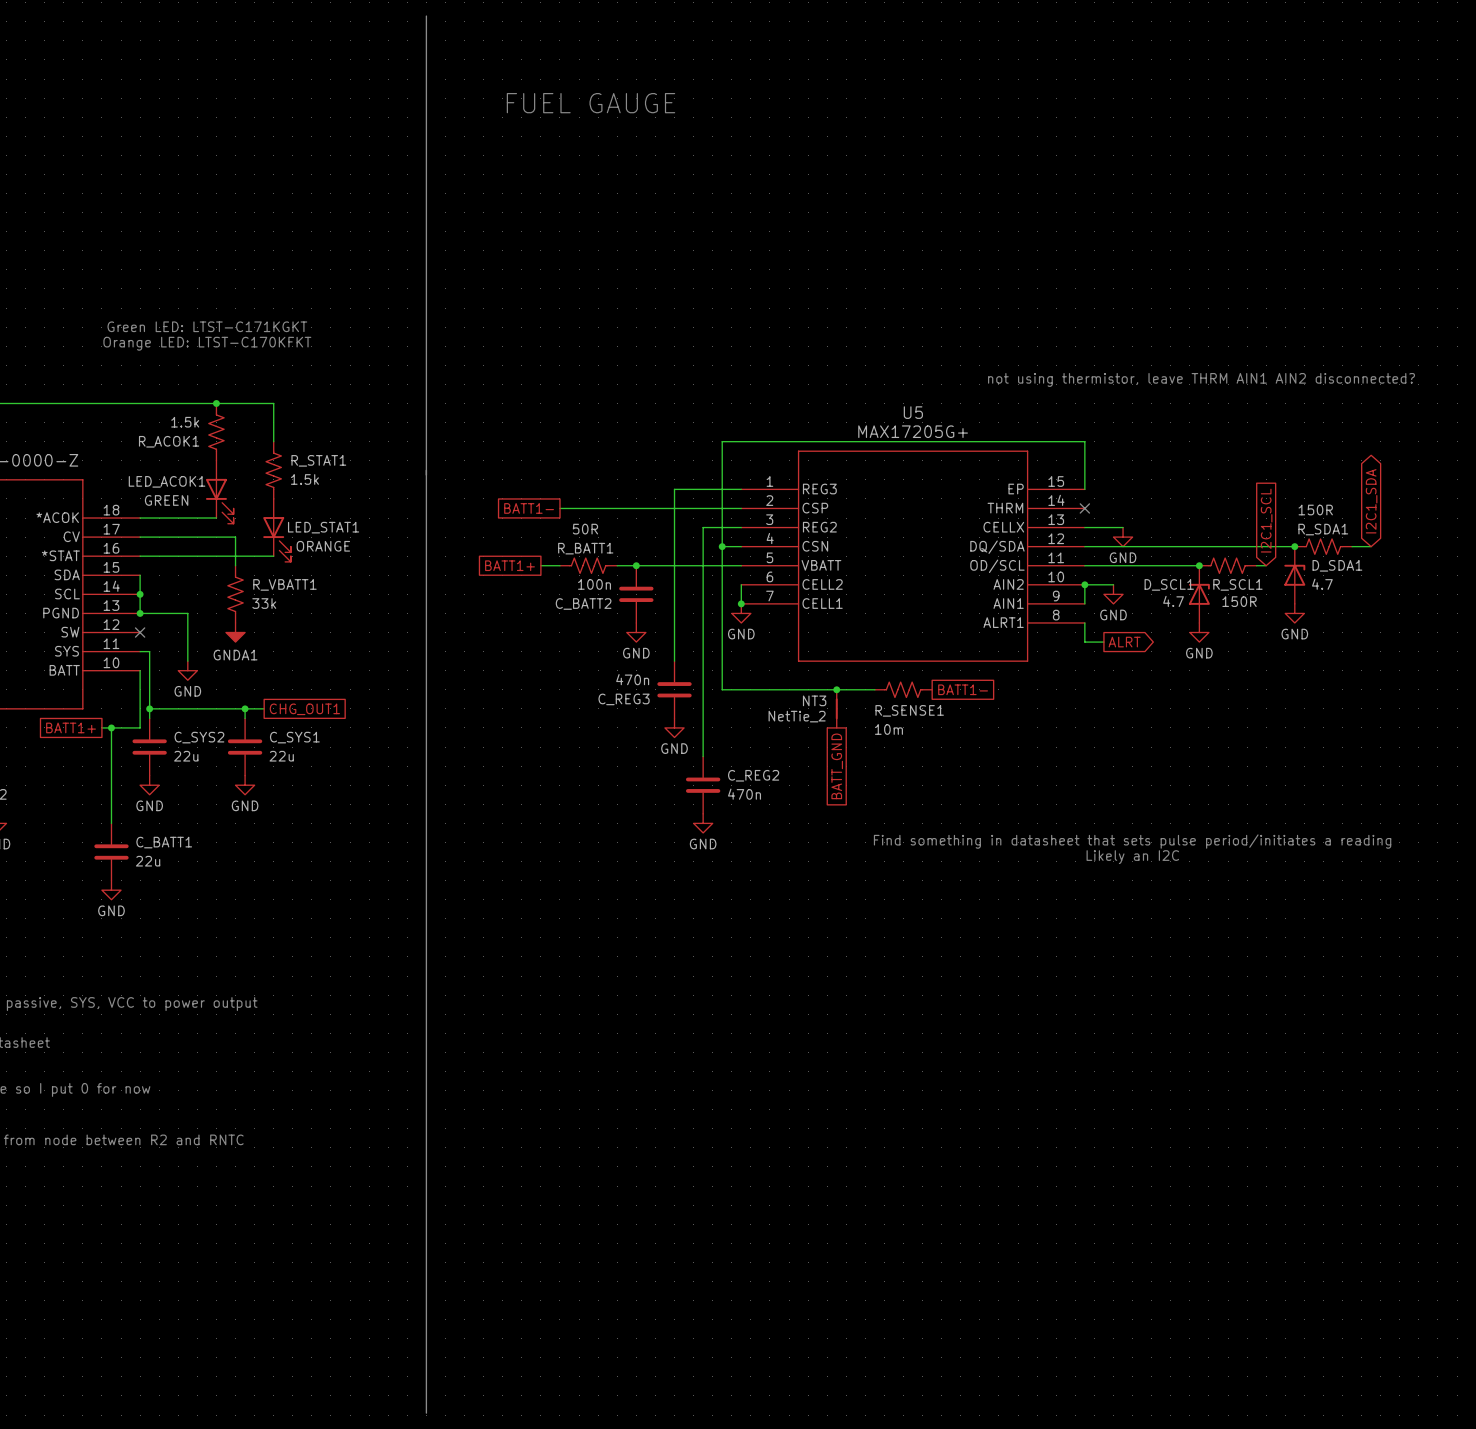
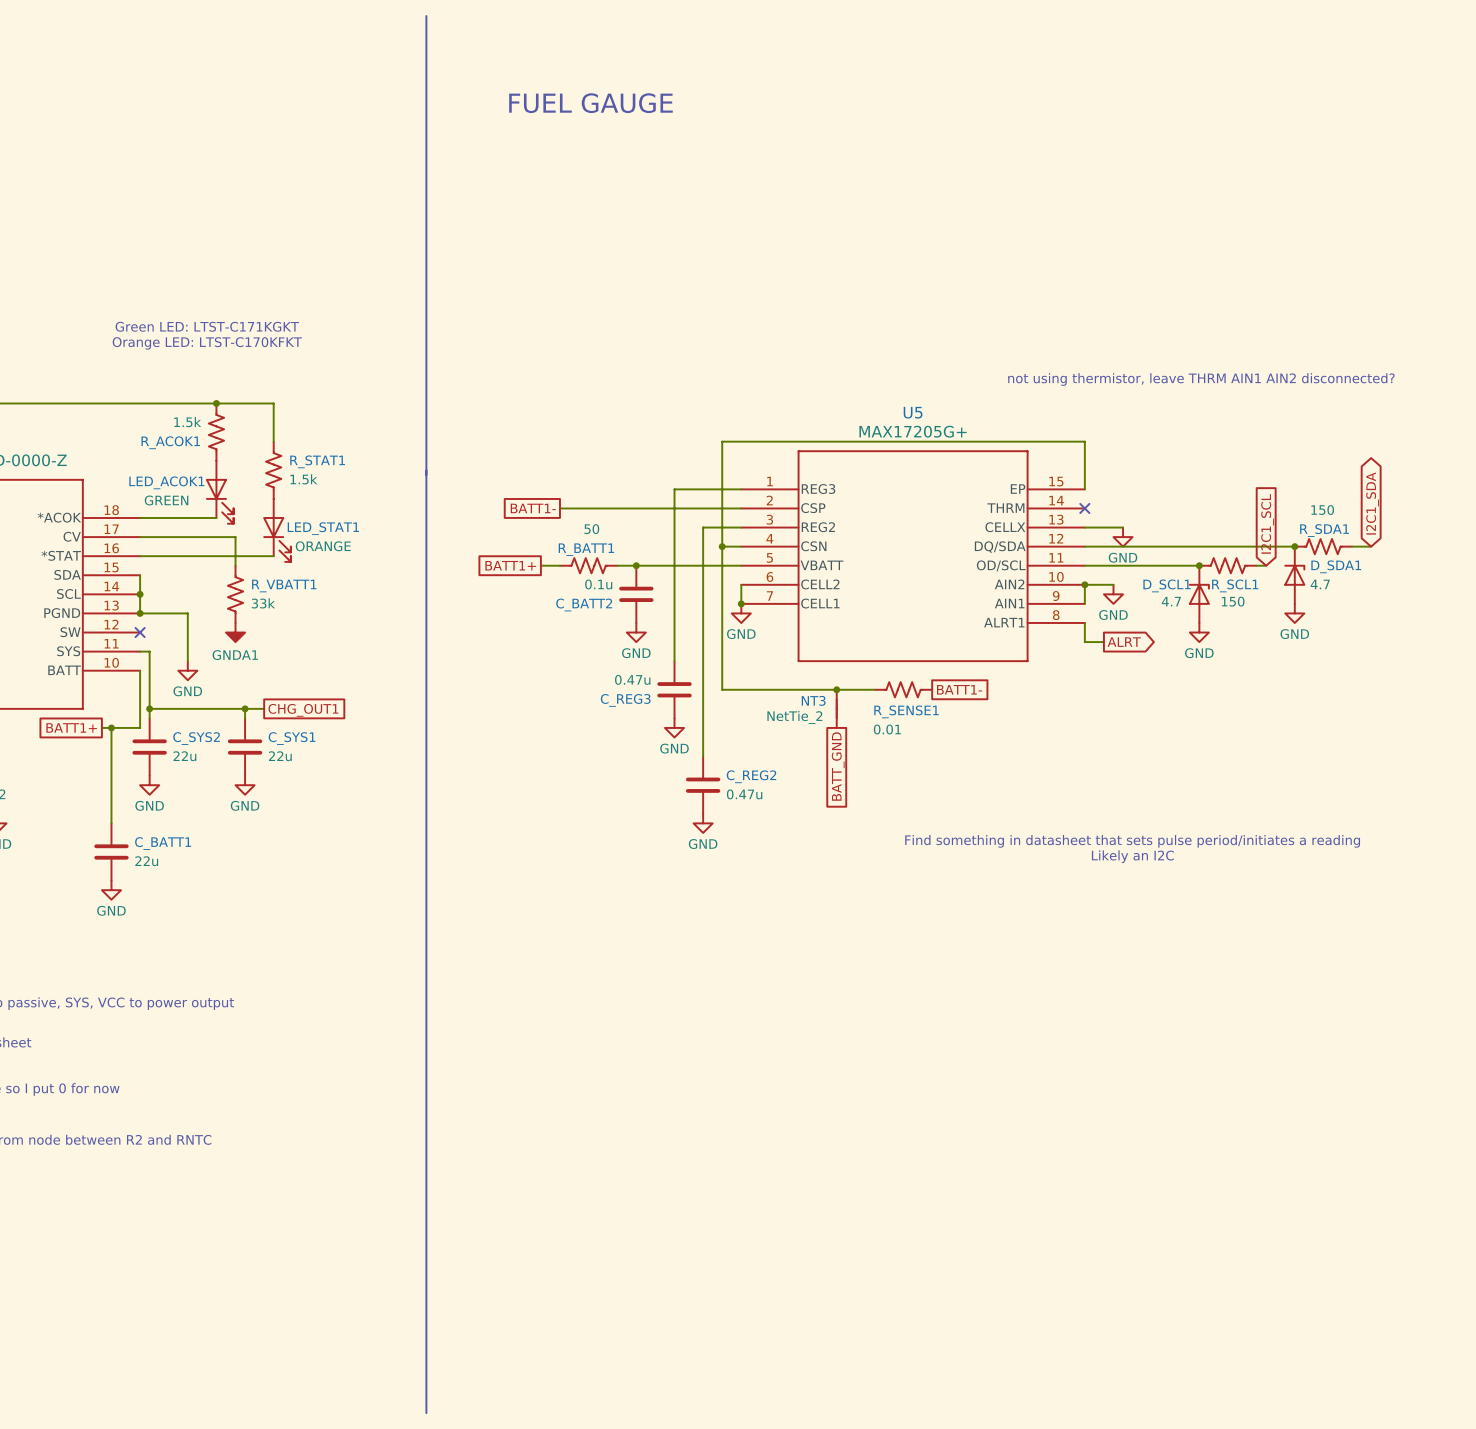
R_SDA1 value: 150R (1315, 510) -> 150 (1322, 510)
R_BATT1 value: 50R (585, 529) -> 50 (591, 529)
C_BATT2 value: 100n (594, 584) -> 0.1u (598, 584)
R_SCL1 value: 150R (1239, 601) -> 150 (1233, 601)
C_REG3 value: 470n (632, 679) -> 0.47u (632, 679)
R_SENSE1 value: 10m (888, 729) -> 0.01 (887, 729)
C_REG2 value: 470n (744, 794) -> 0.47u (744, 794)

